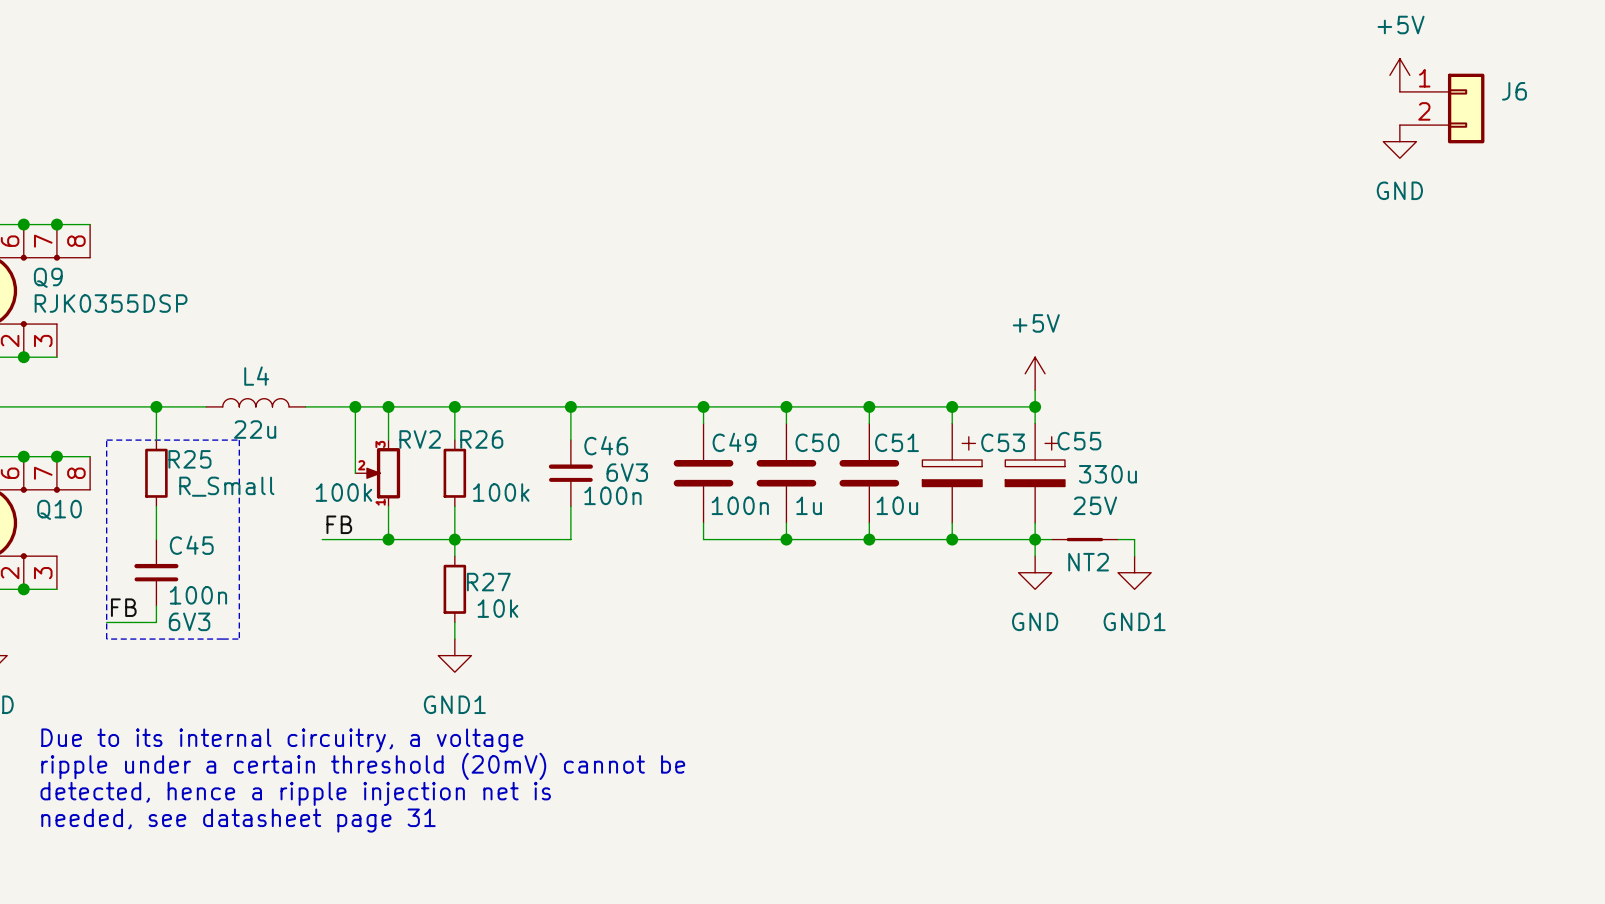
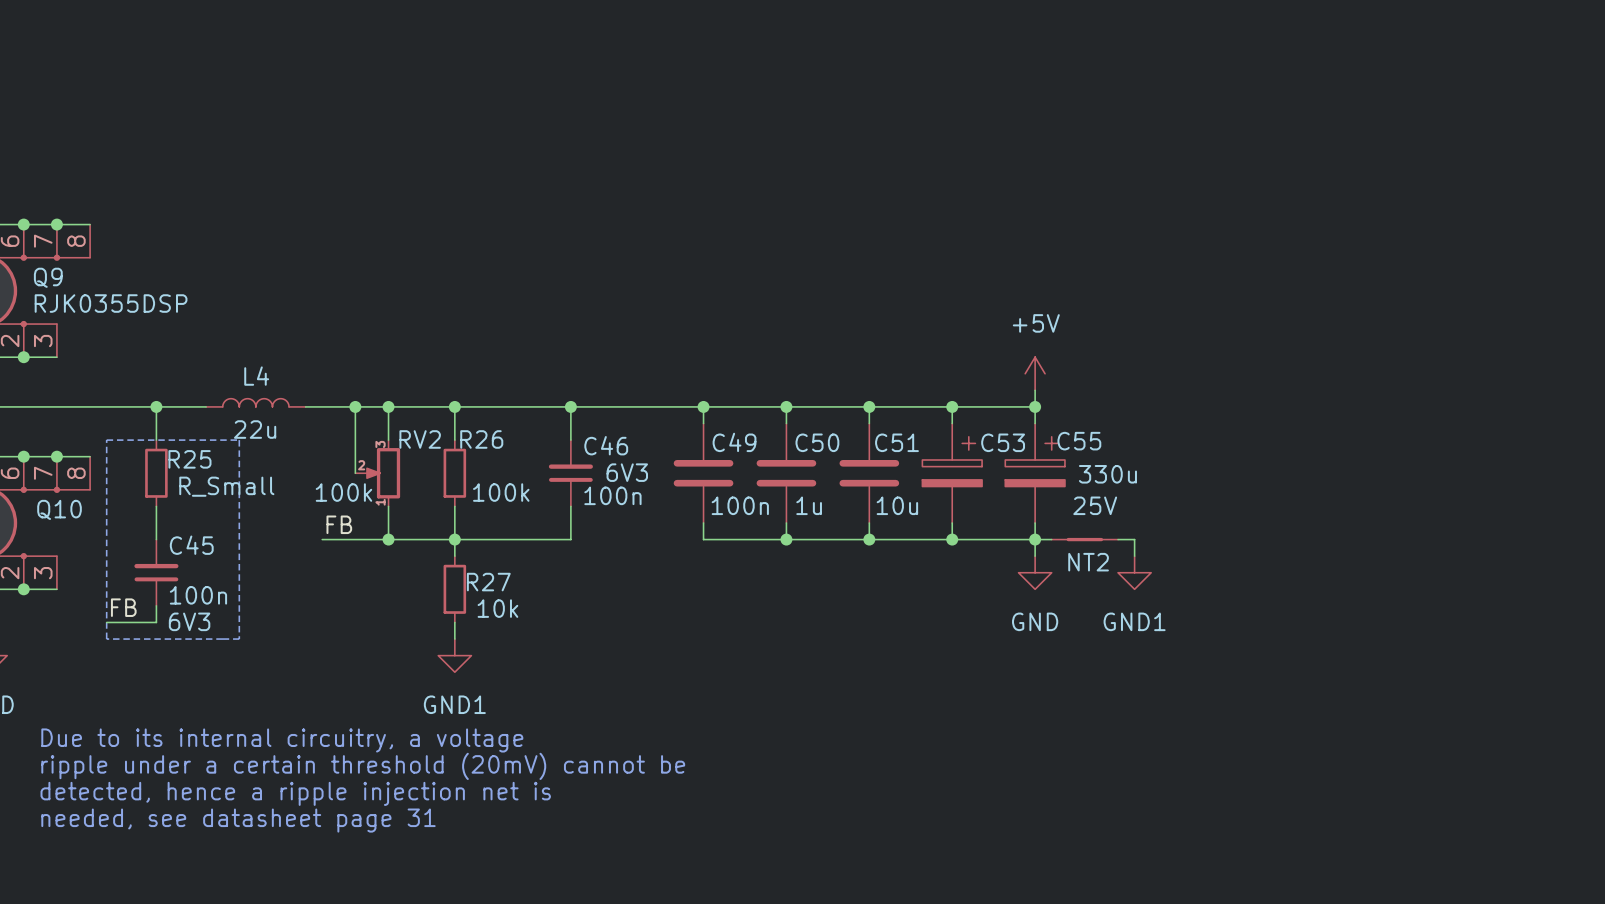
power symbol: +5V (1399, 75) -> none
J6: (1442, 108) -> none
power symbol: GND (1399, 141) -> none

